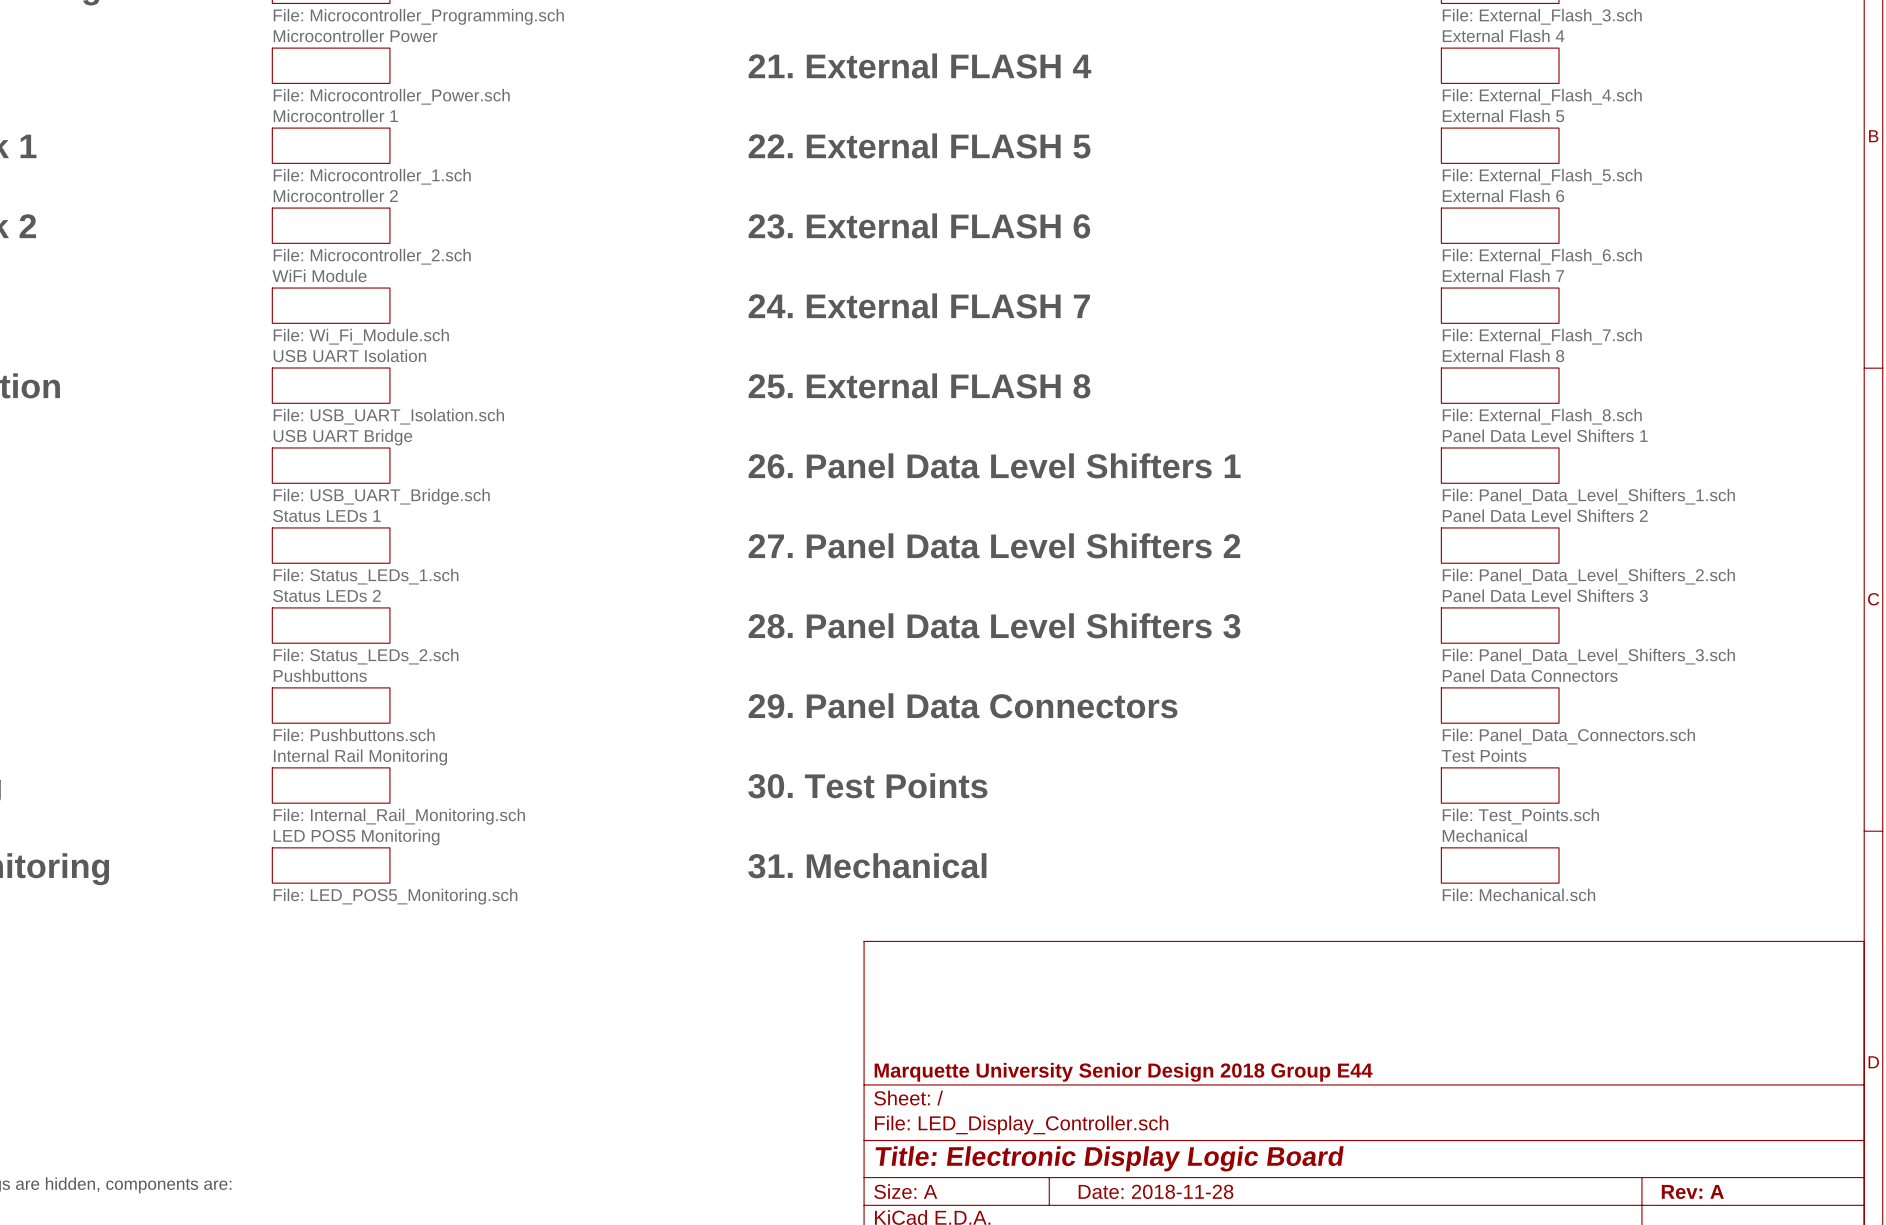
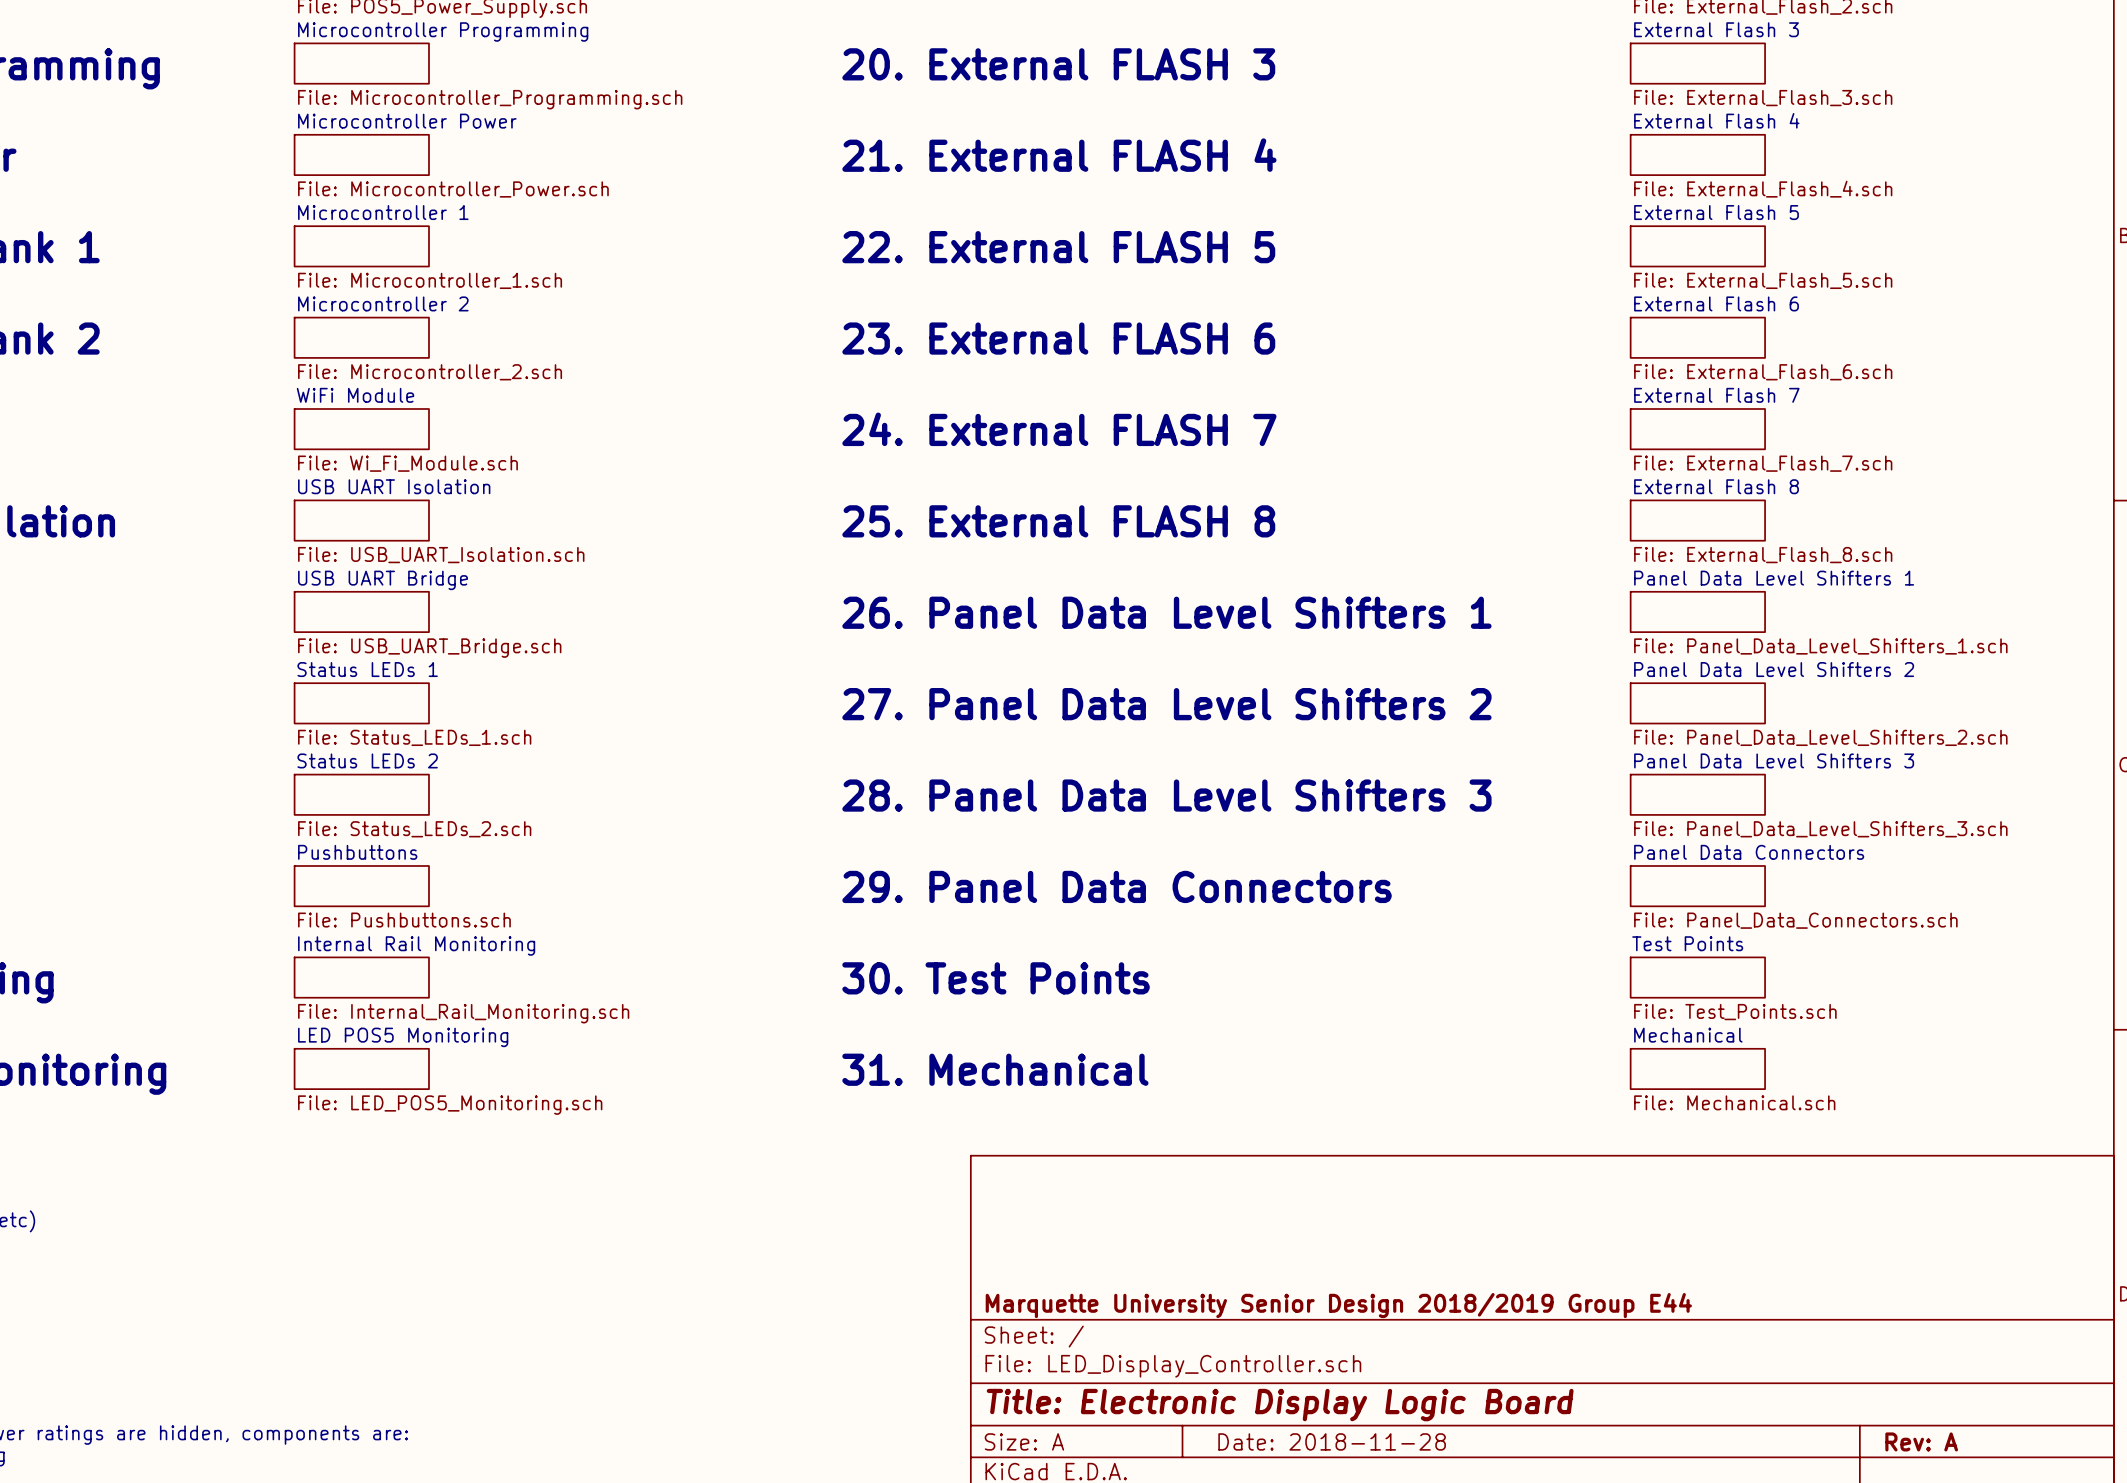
title block: Marquette University Senior Design 2018 Group E44 (1123, 1072) -> Marquette University Senior Design 2018/2019 Group E44 (1338, 1305)

